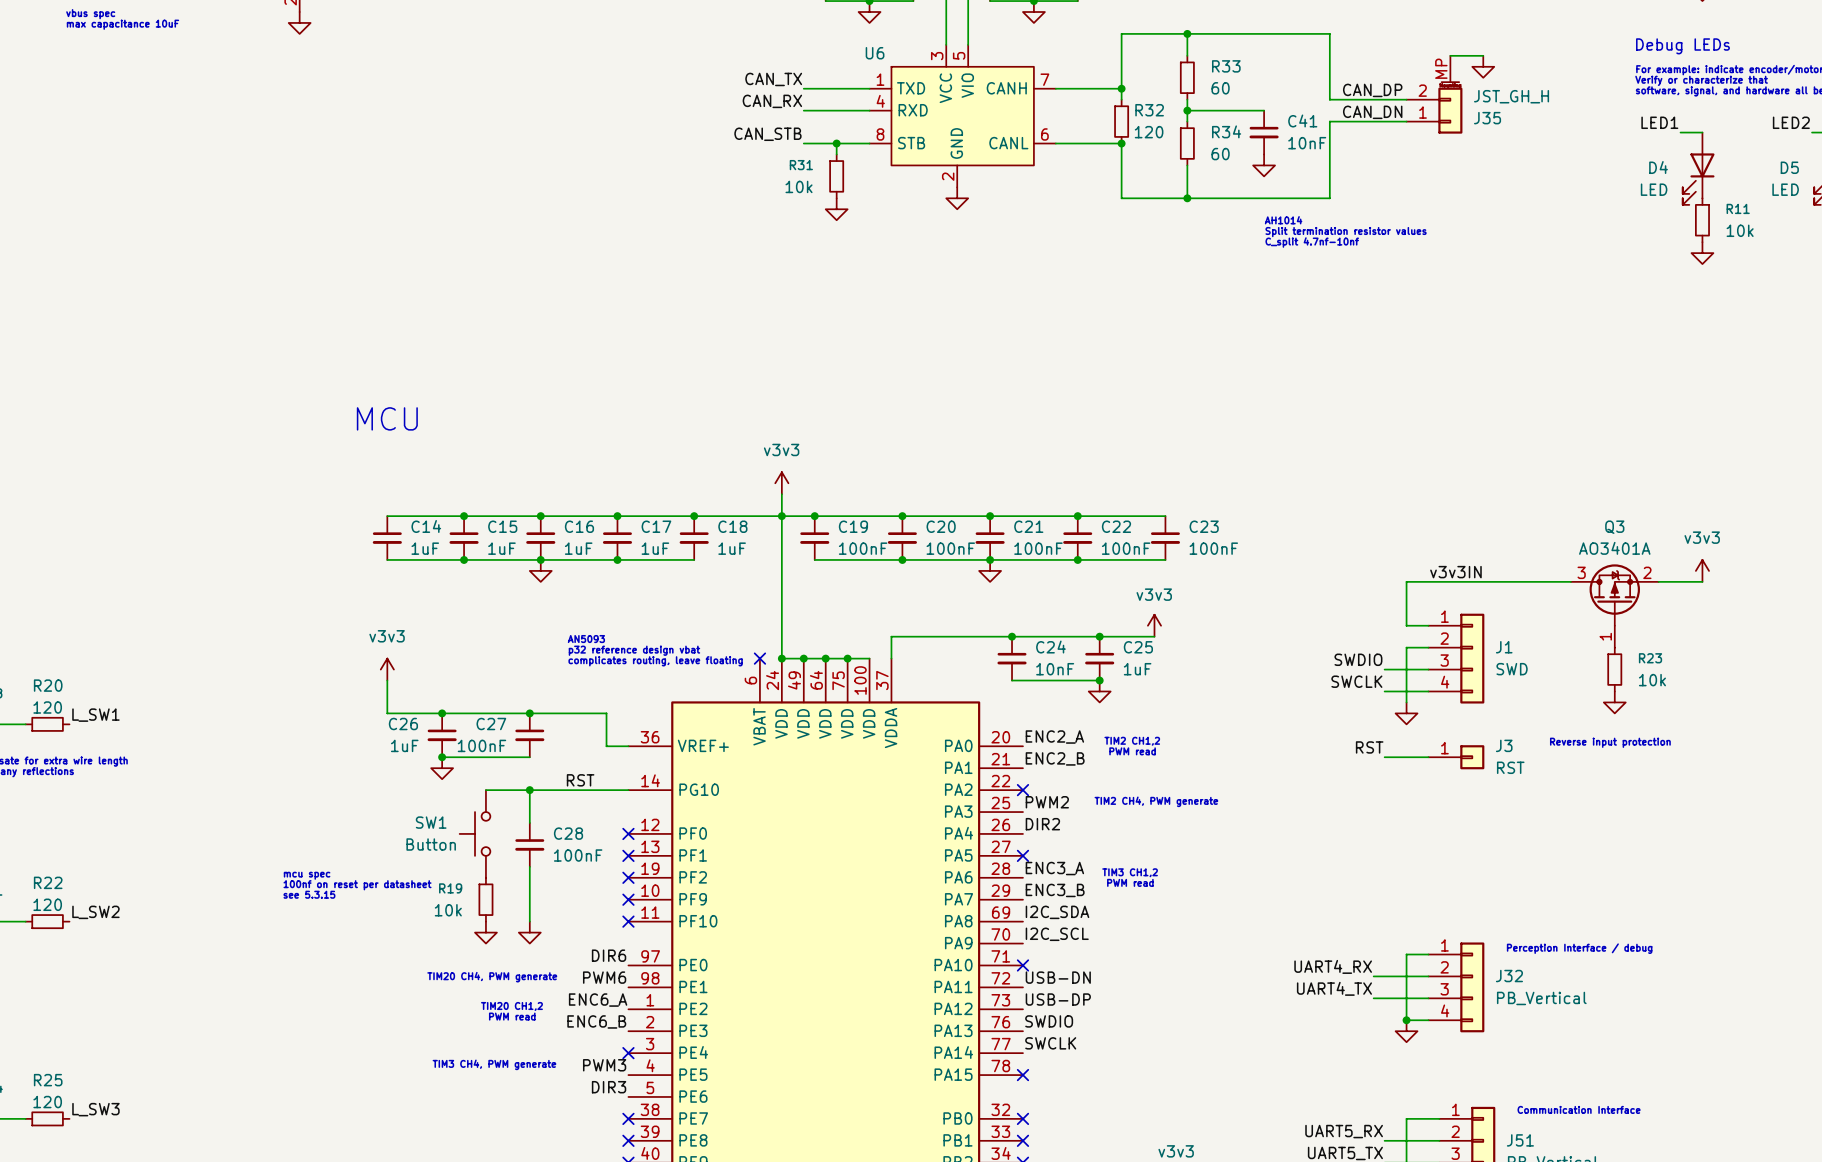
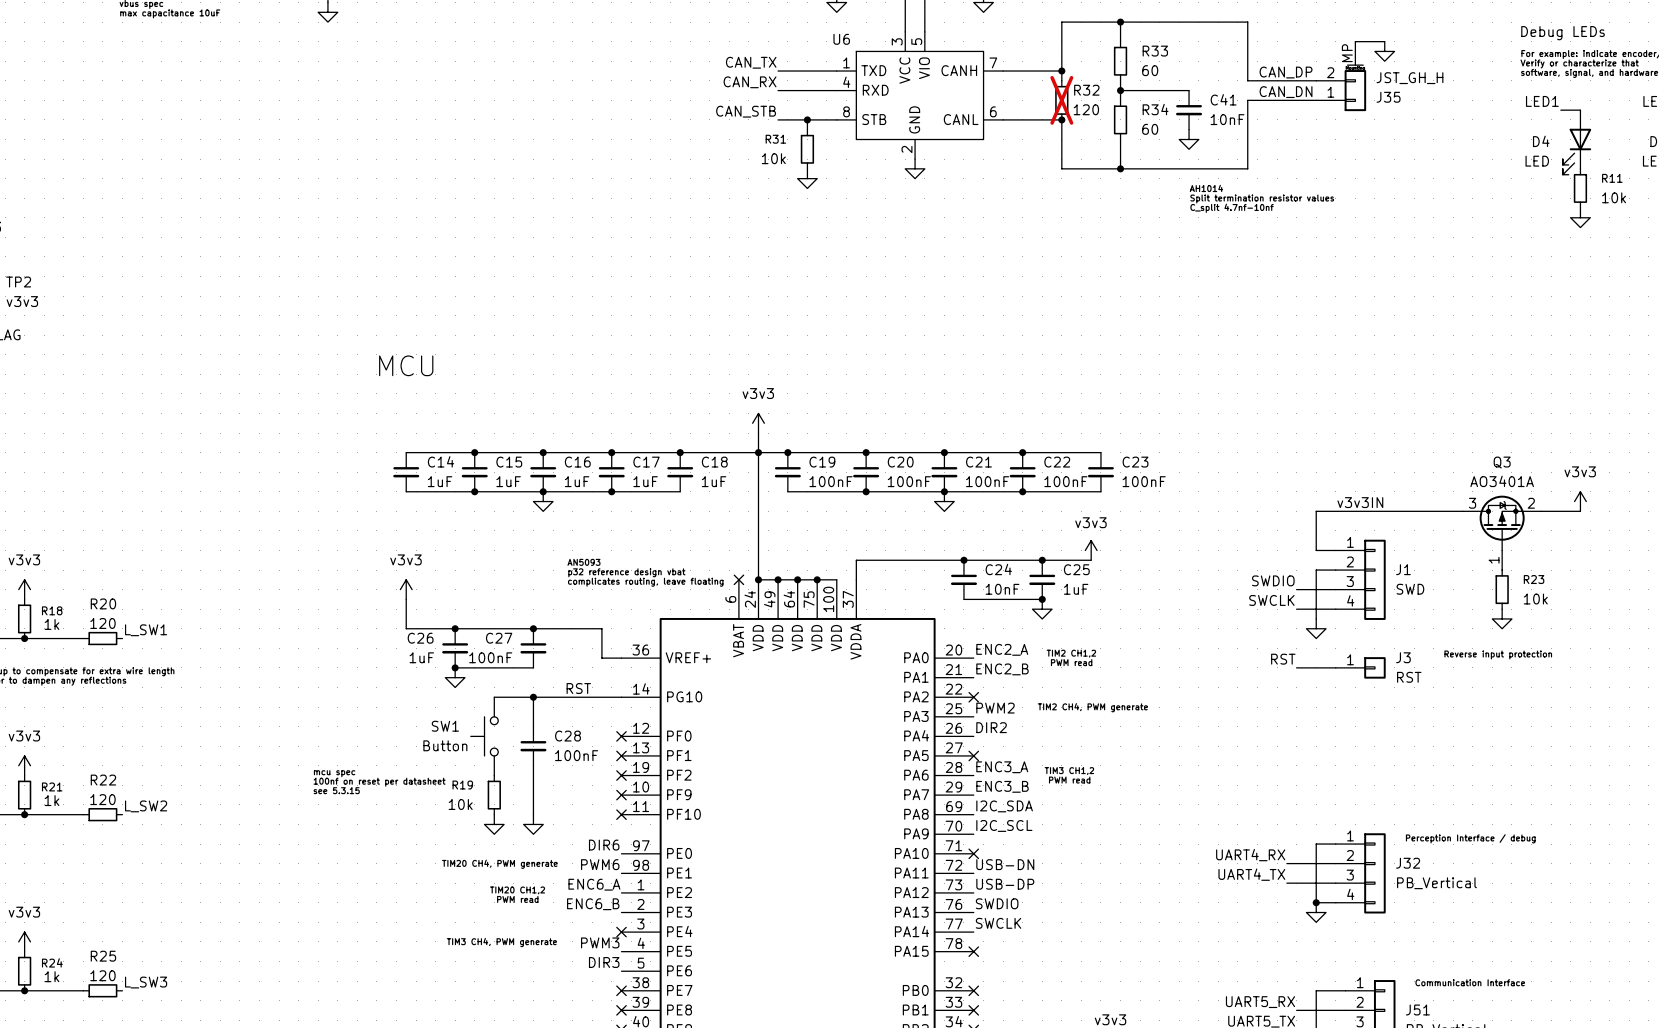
R32 do-not-place cross: none -> (1061, 100)

